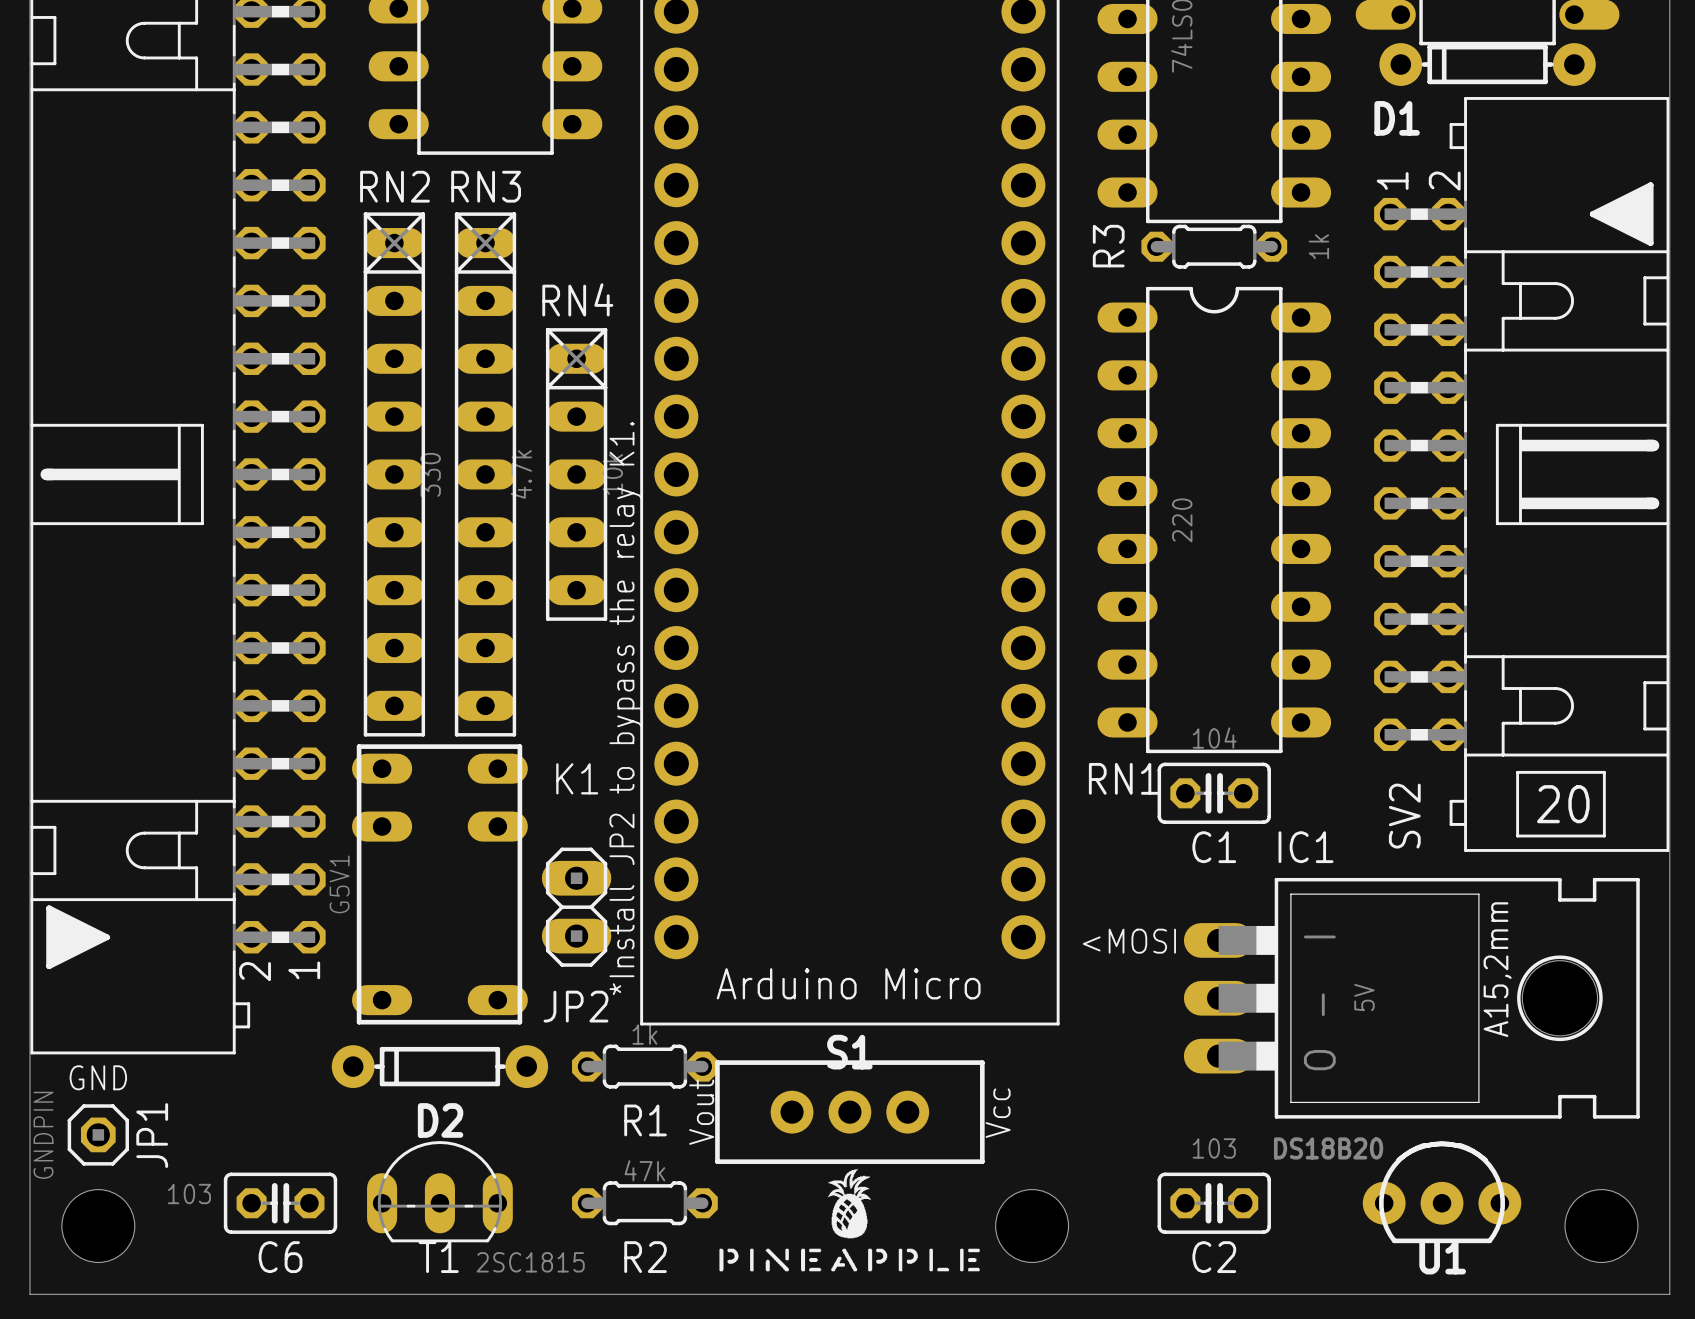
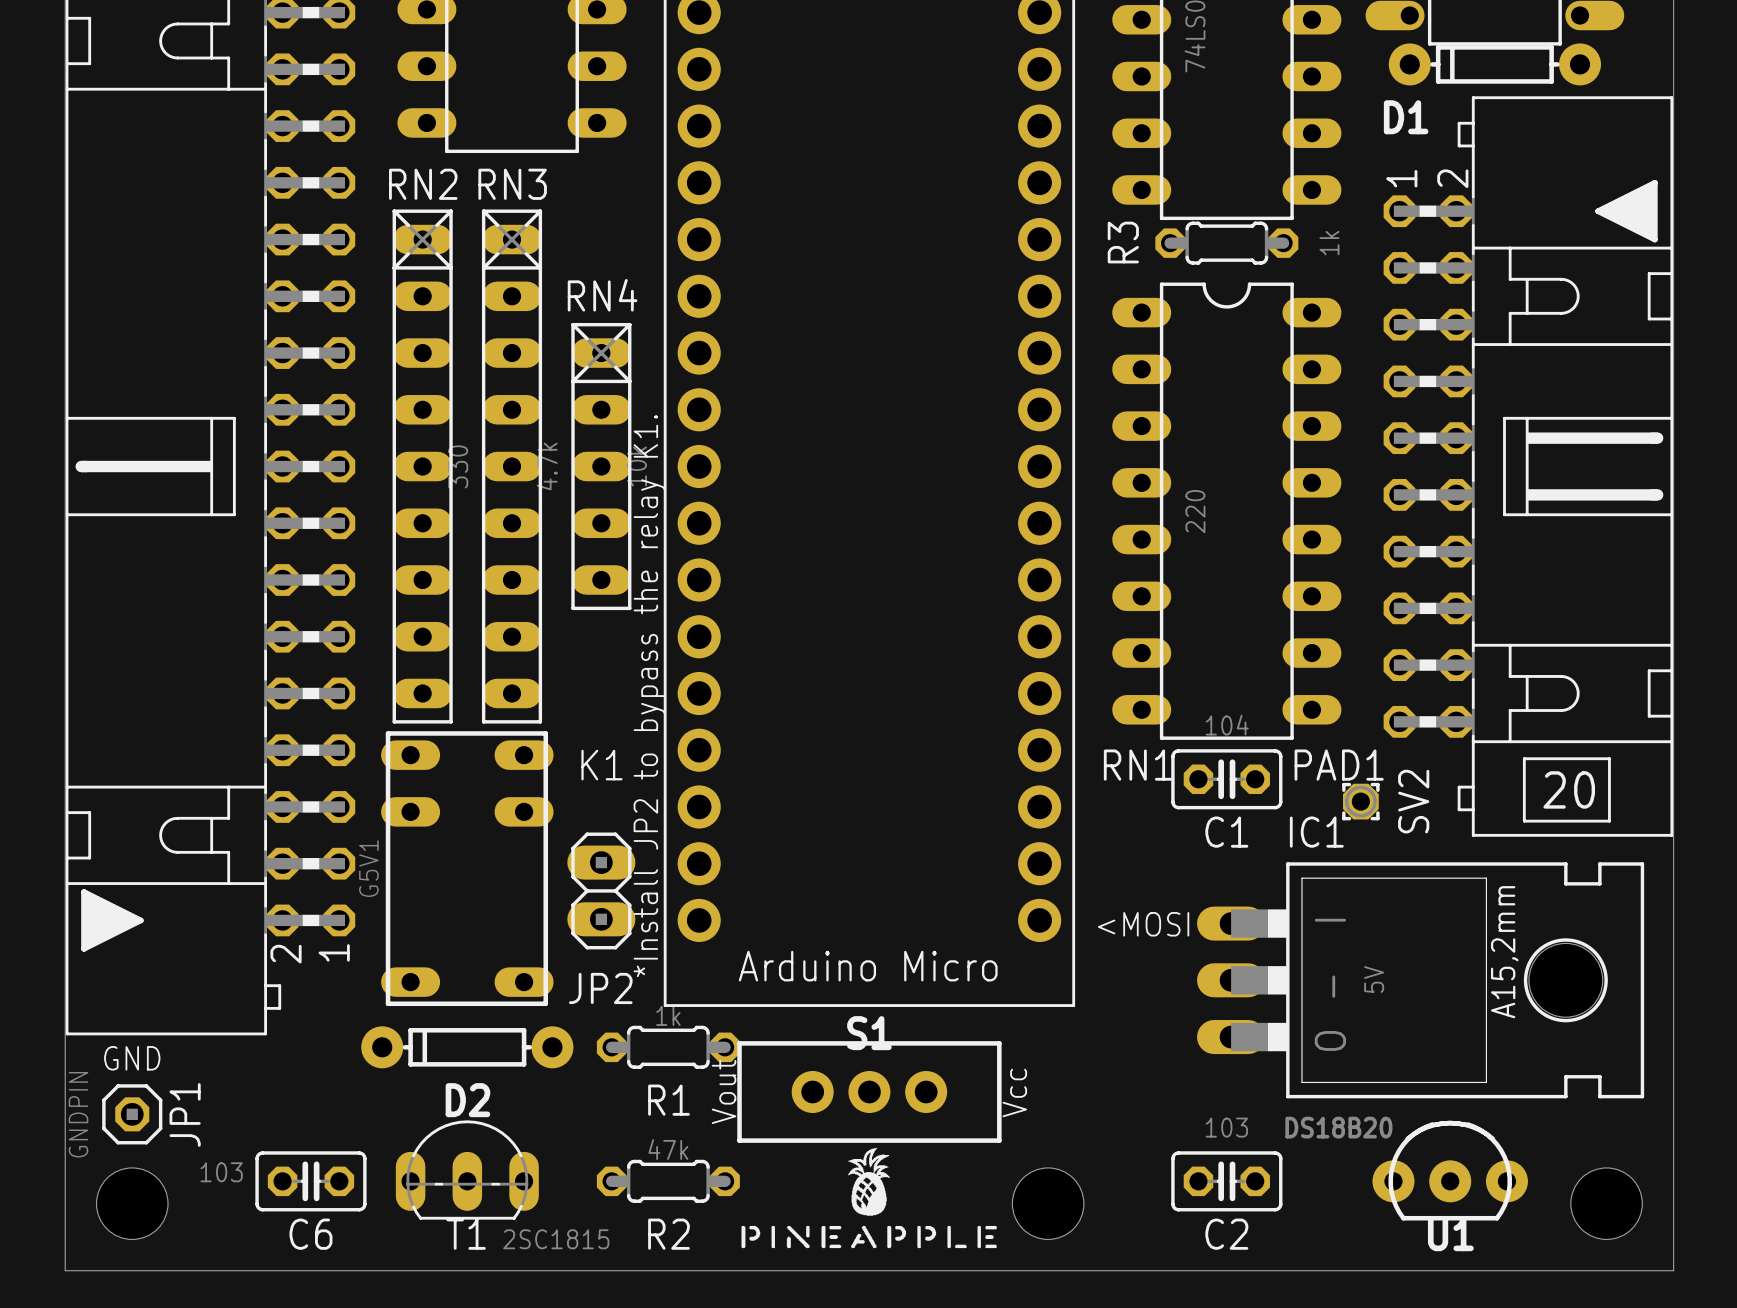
PAD1: none -> (1360, 801)

